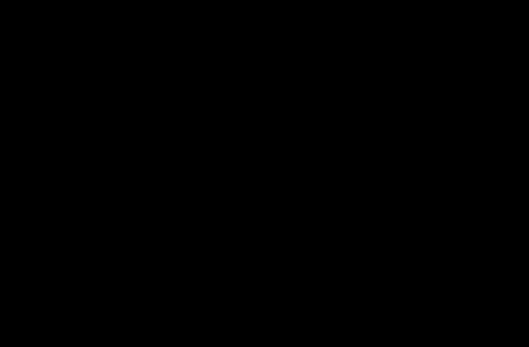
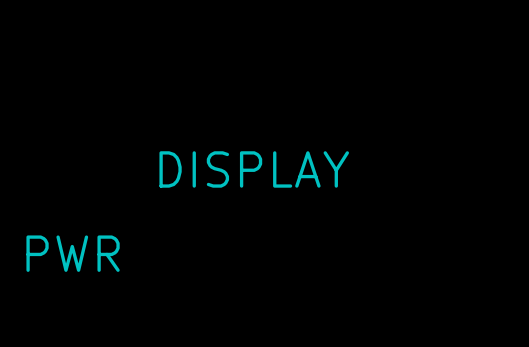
text: none -> DISPLAY (254, 169)
text: none -> PWR (73, 253)

